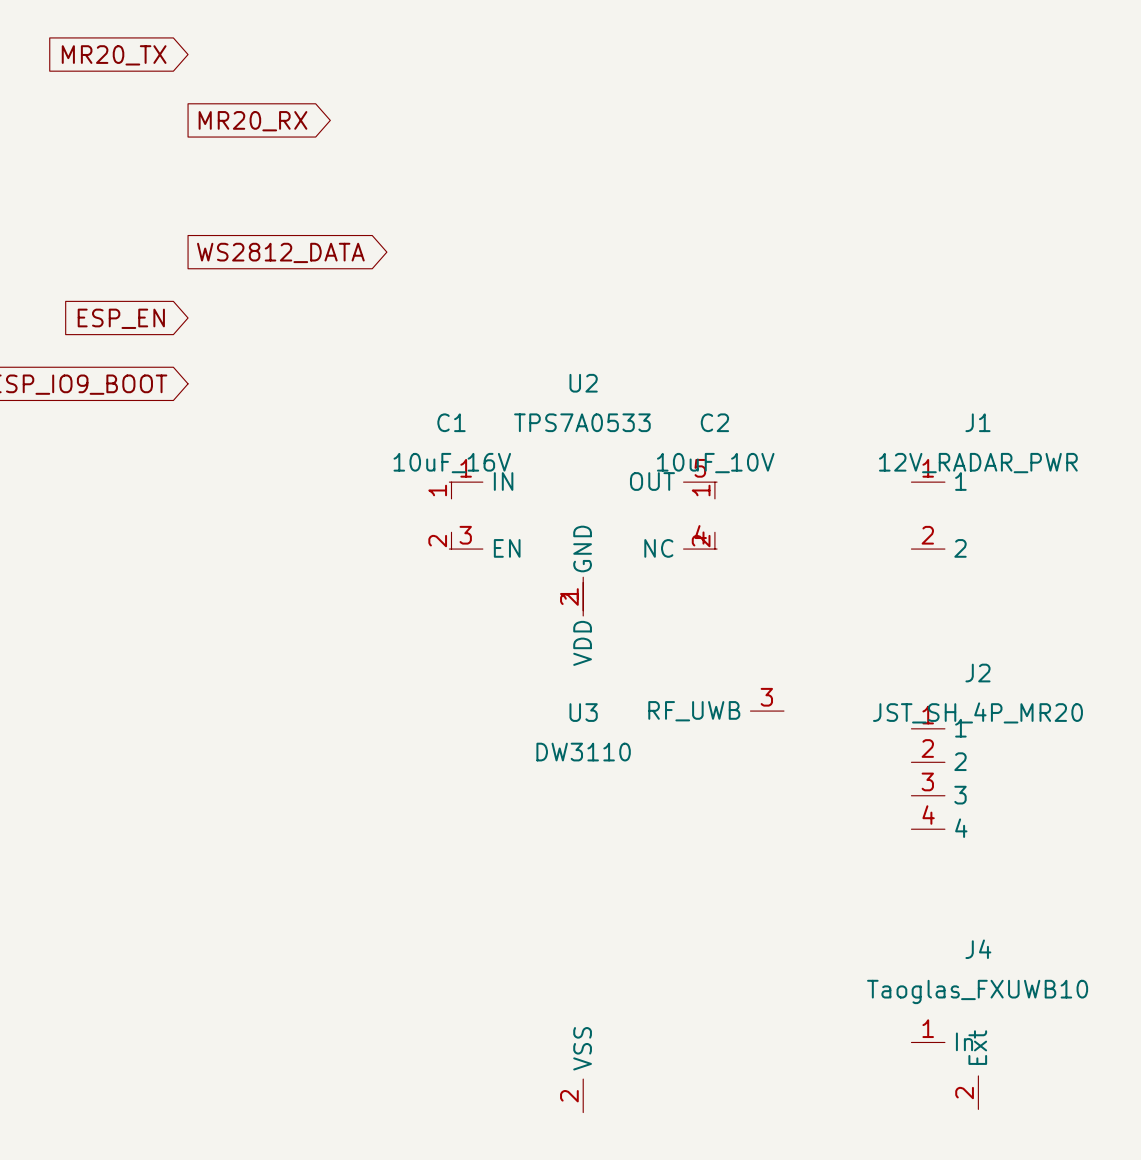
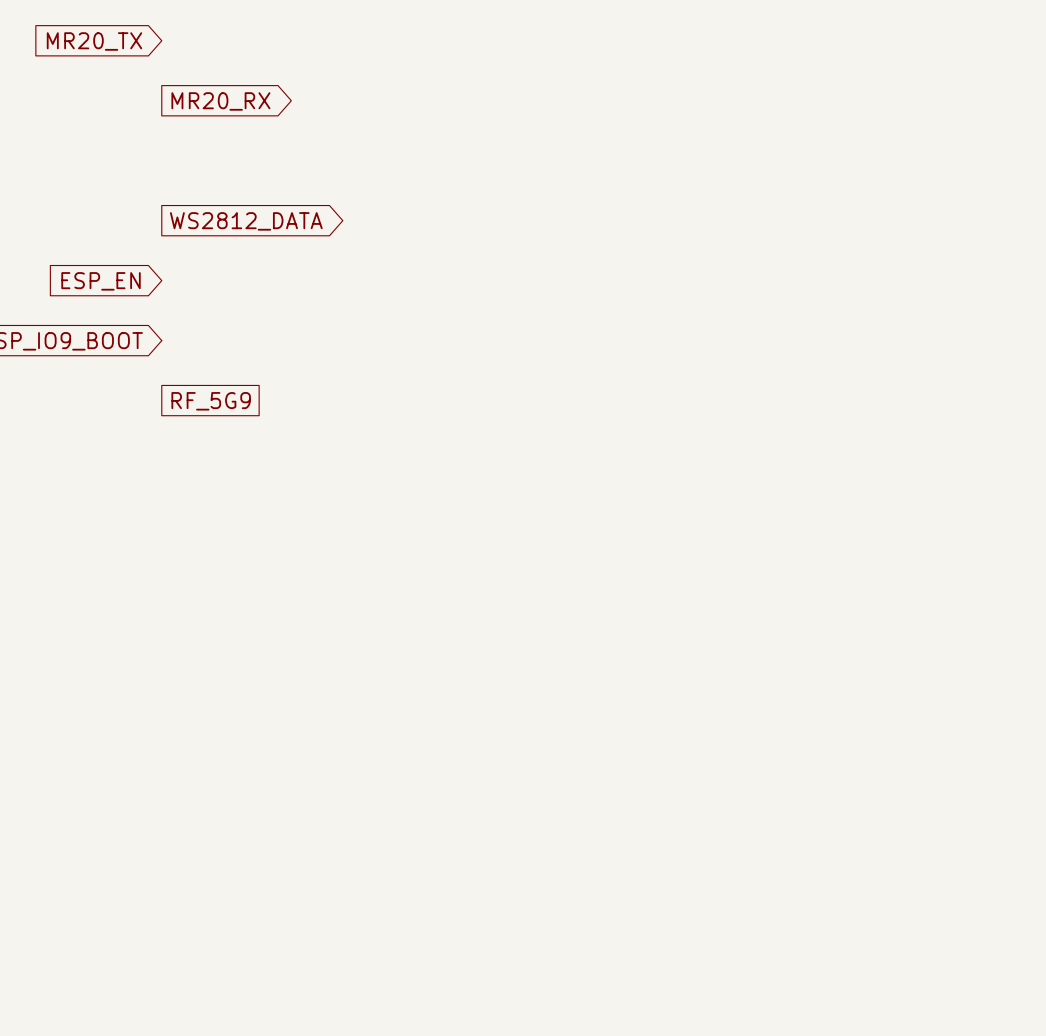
global label: none -> RF_5G9 (211, 401)
C1: 10uF_16V (451, 515) -> none
C2: 10uF_10V (714, 515) -> none
J1: 12V_RADAR_PWR (928, 515) -> none
U2: TPS7A0533 (583, 549) -> none
J2: JST_SH_4P_MR20 (928, 779) -> none
U3: DW3110 (683, 844) -> none
J4: Taoglas_FXUWB10 (944, 1075) -> none

